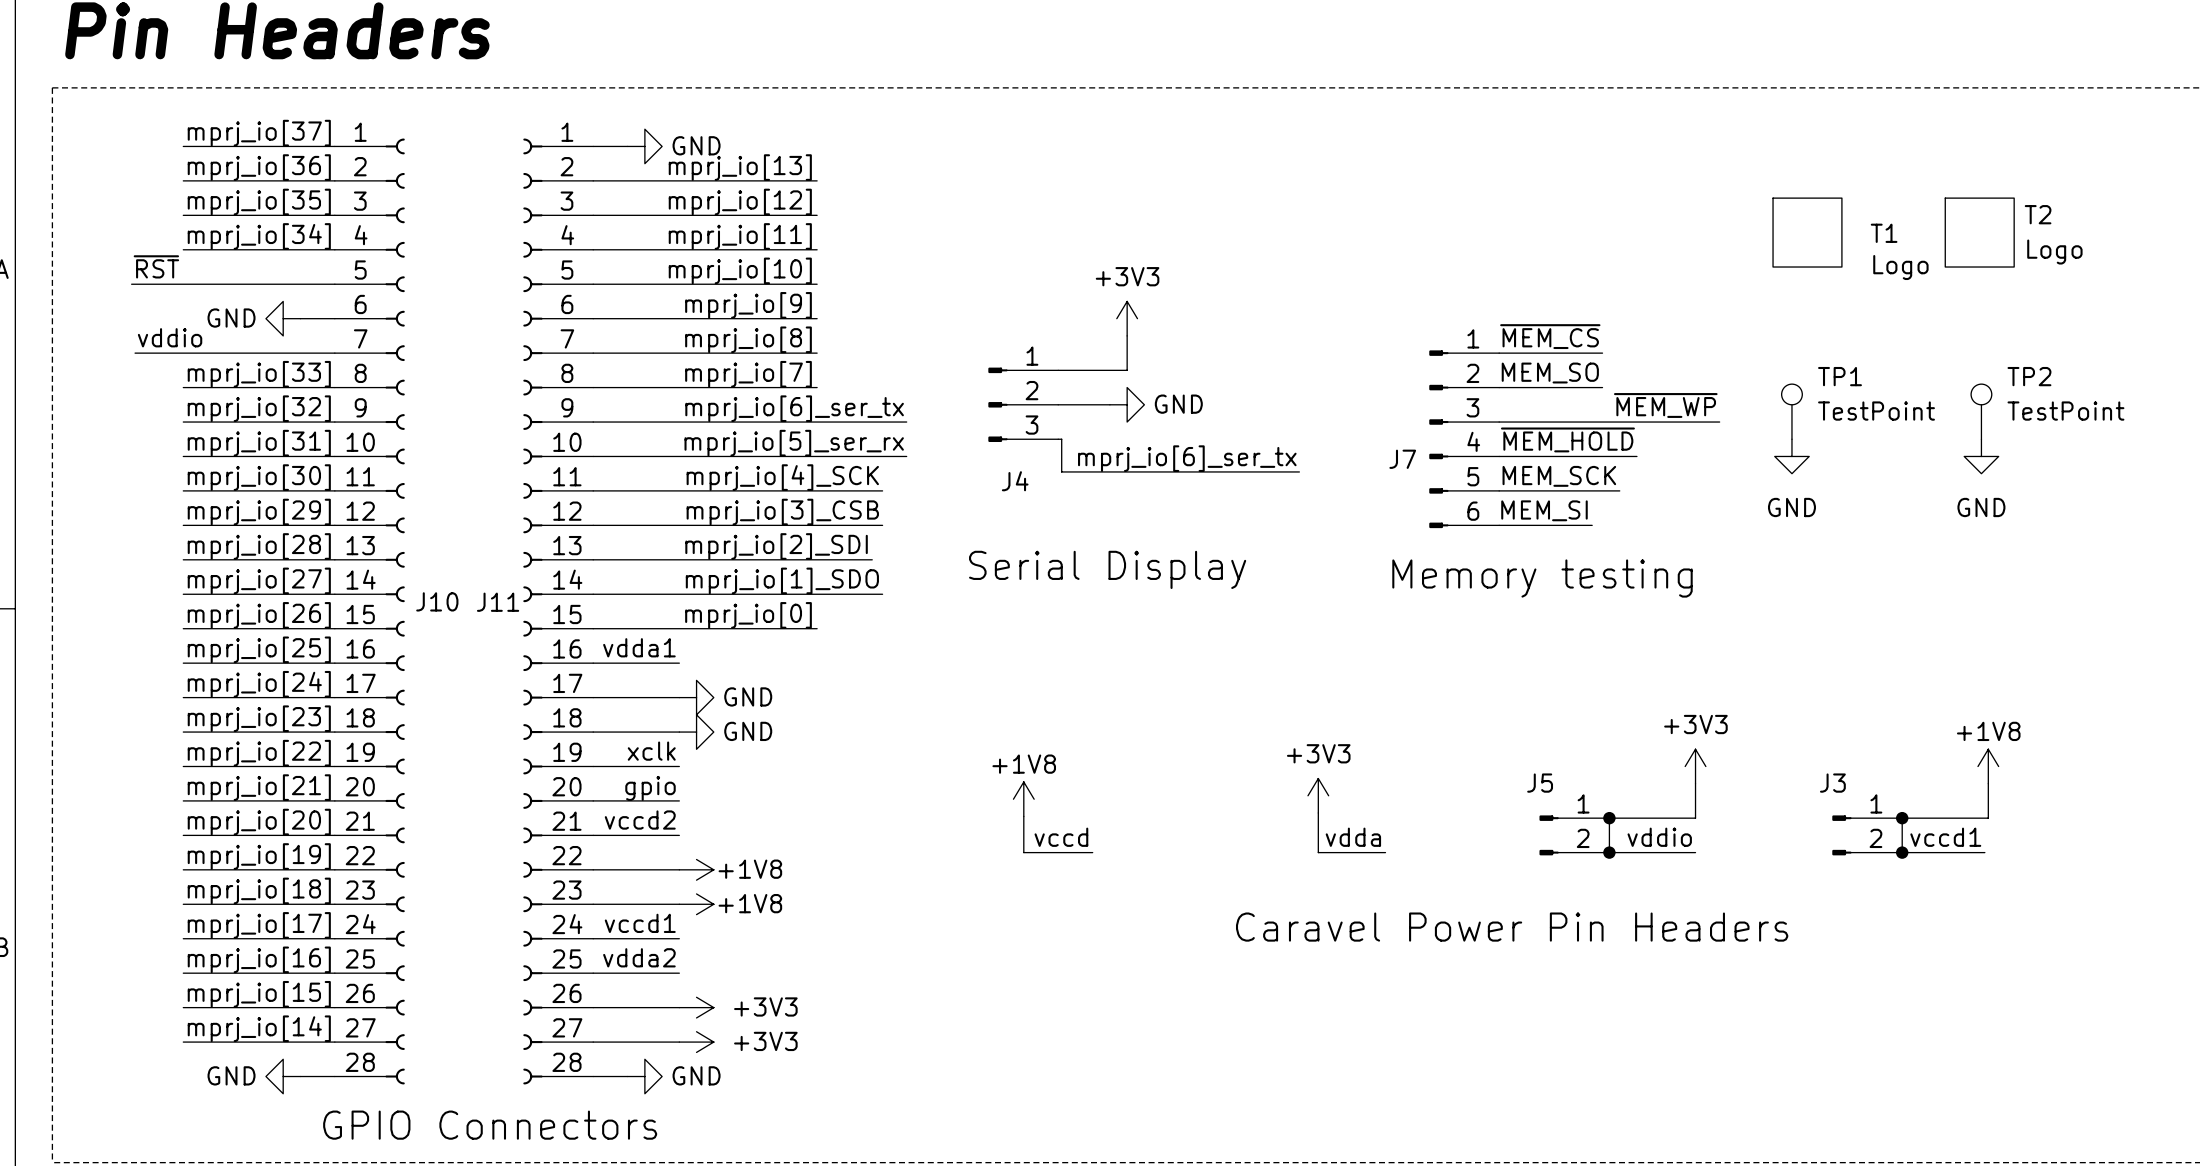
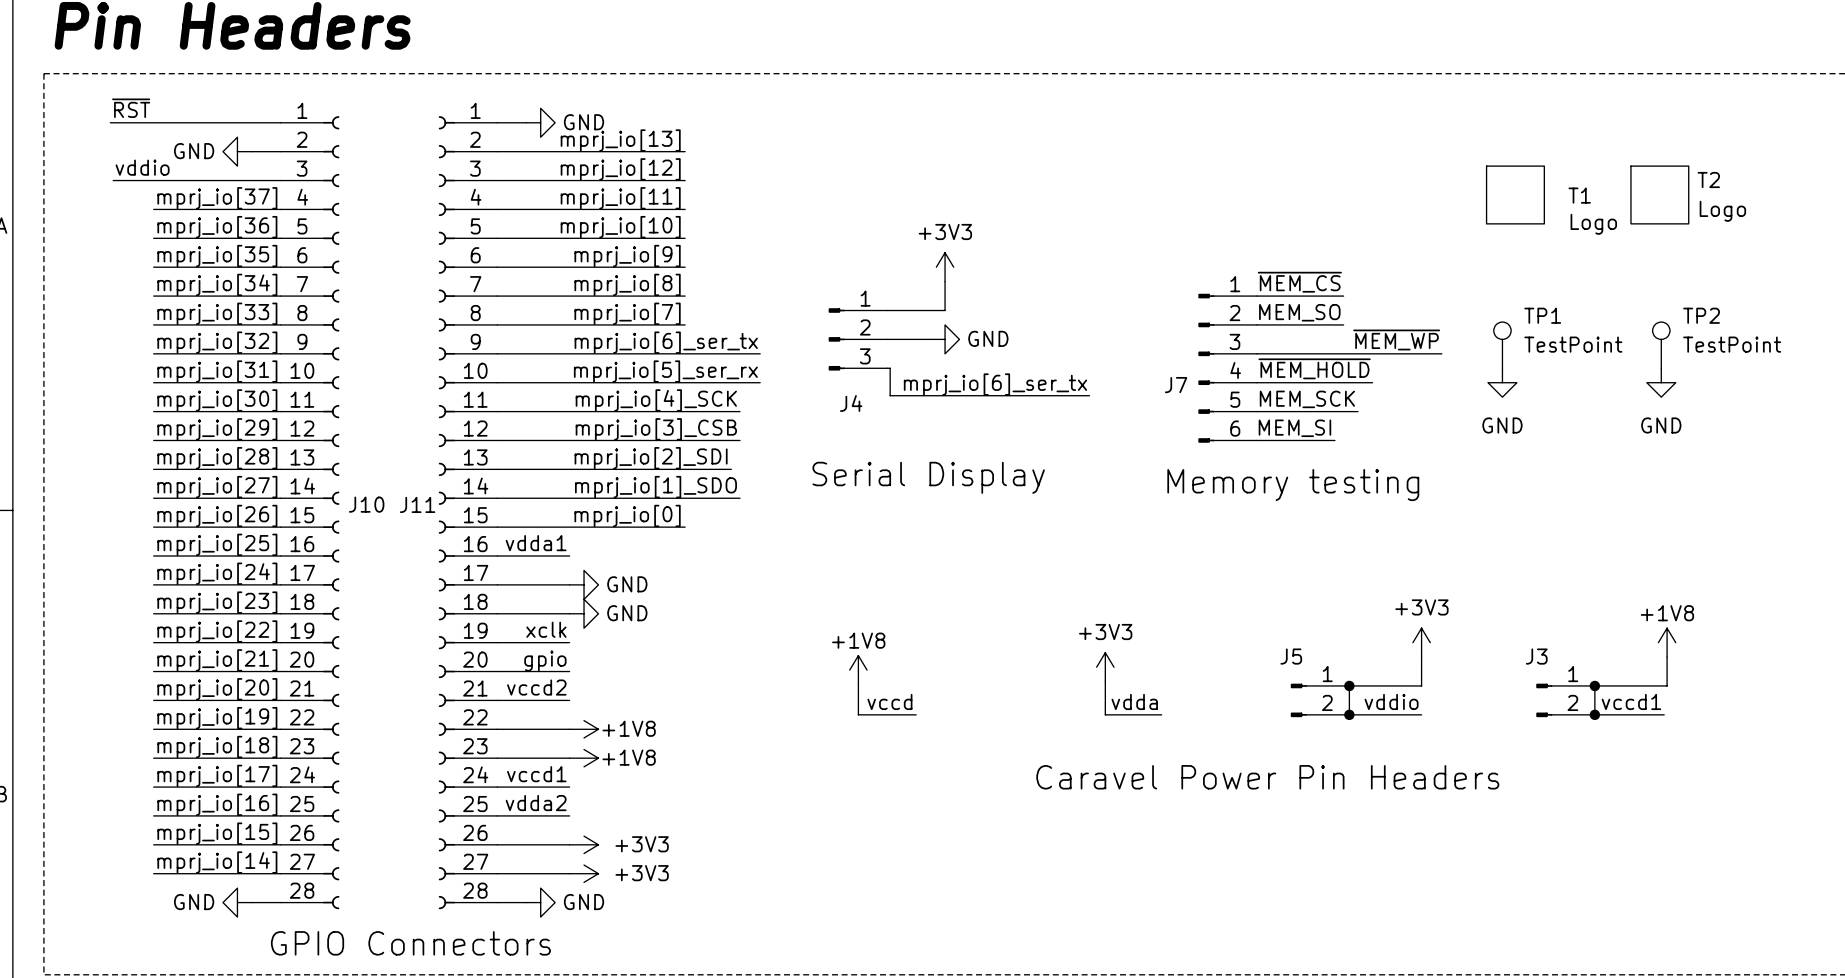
label: mprj_io[37] (259, 133) -> none
label position: mprj_io[36] (259, 167) -> mprj_io[36] (217, 227)
wire: (183, 180) (300, 180) -> (153, 267) (251, 267)
label position: mprj_io[35] (259, 202) -> mprj_io[35] (217, 256)
label: mprj_io[34] (259, 236) -> mprj_io[37] (217, 198)
label position: ~{RST} (156, 266) -> ~{RST} (131, 108)
wire: (131, 284) (183, 284) -> (110, 122) (153, 122)
power symbol position: GND (283, 318) -> GND (237, 151)
label position: vddio (170, 337) -> vddio (142, 167)
label: none -> mprj_io[34] (217, 284)
wire: (135, 353) (183, 353) -> (113, 180) (153, 180)

